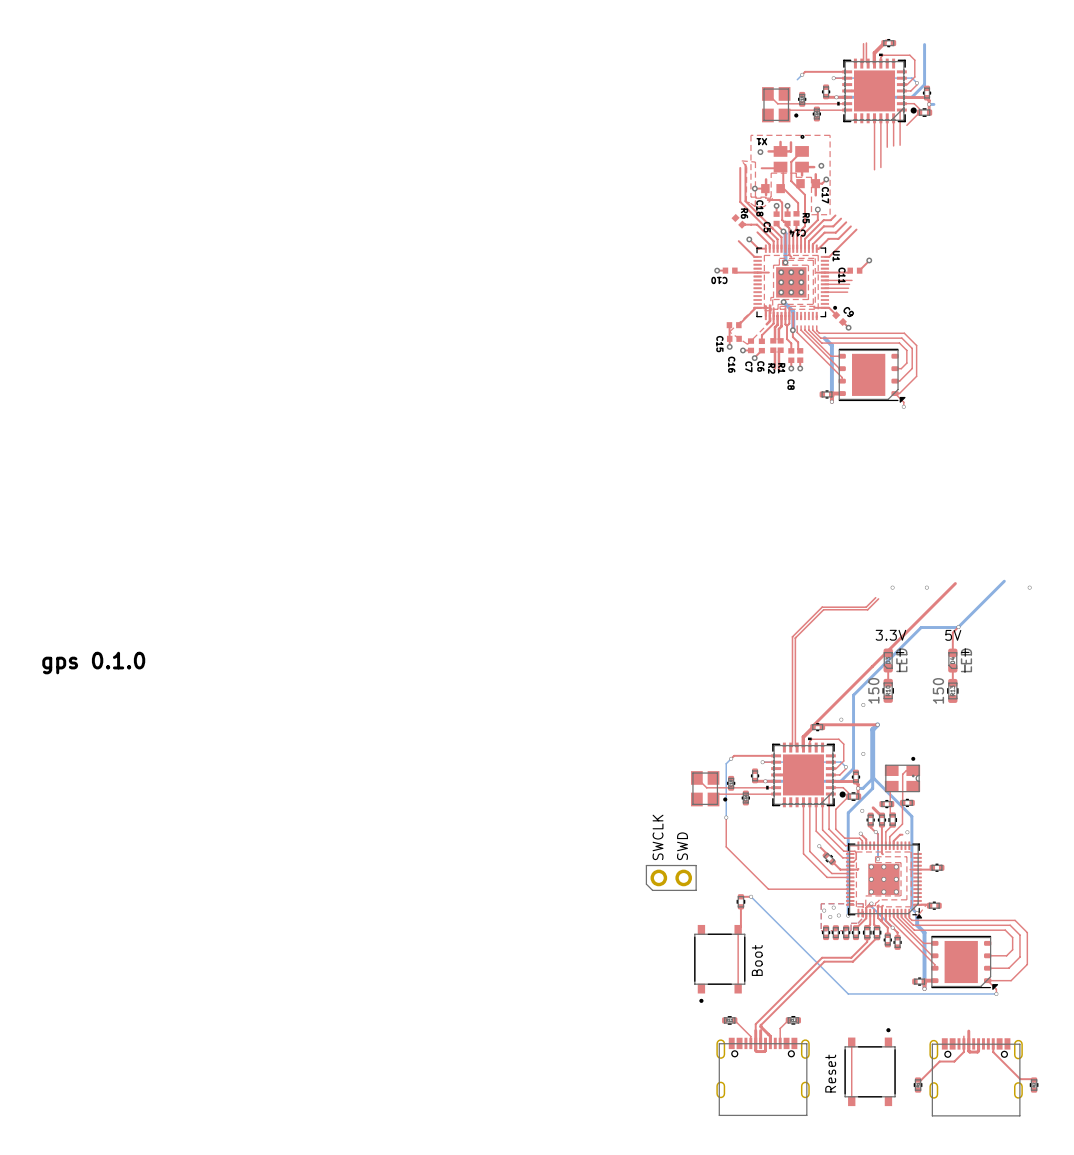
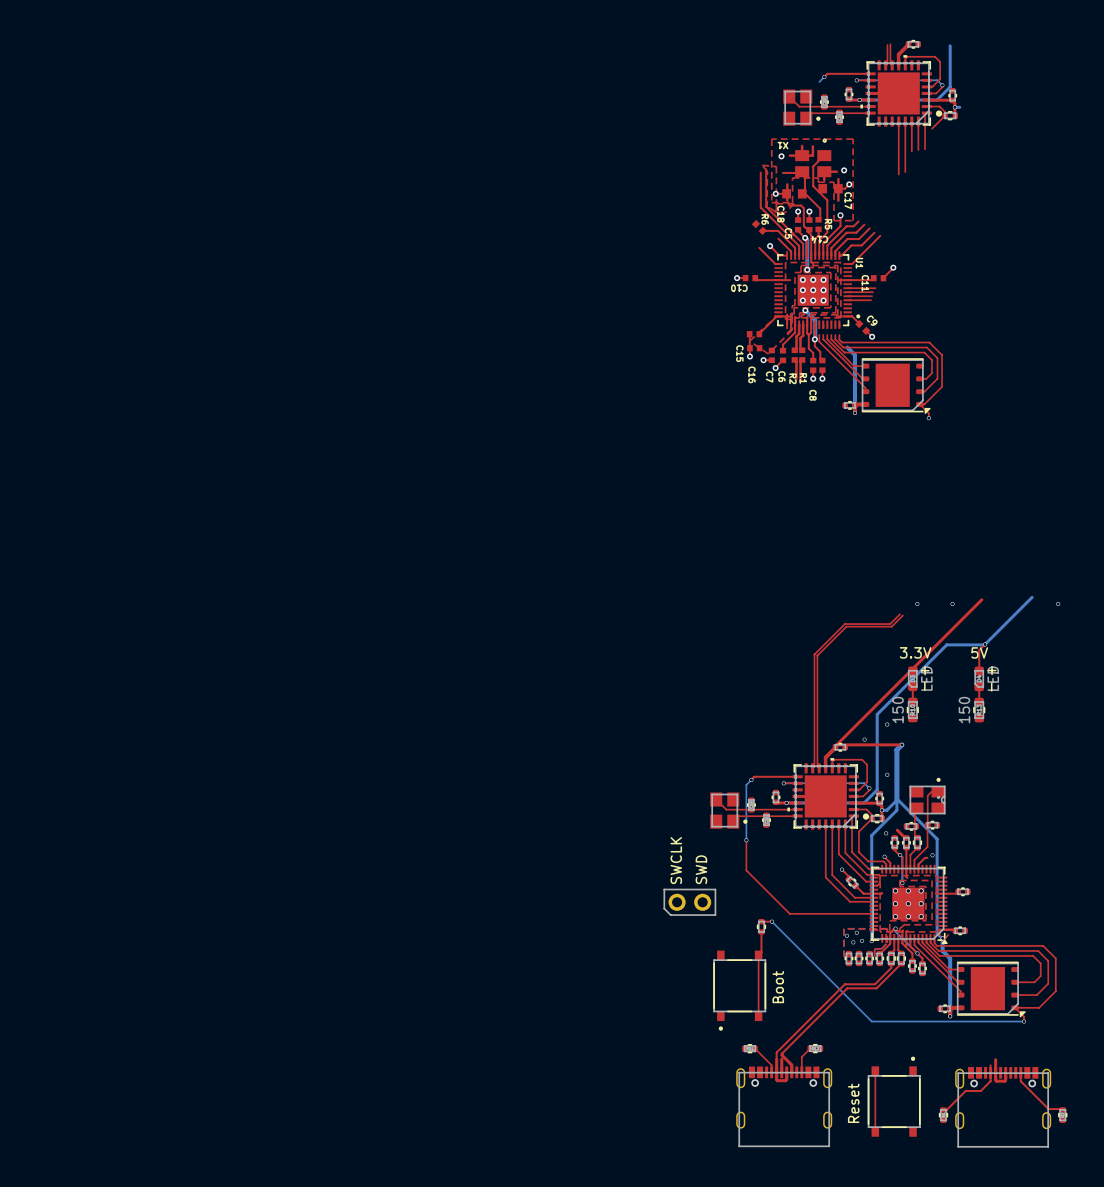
text: gps 0.1.0 (93, 663) -> none

